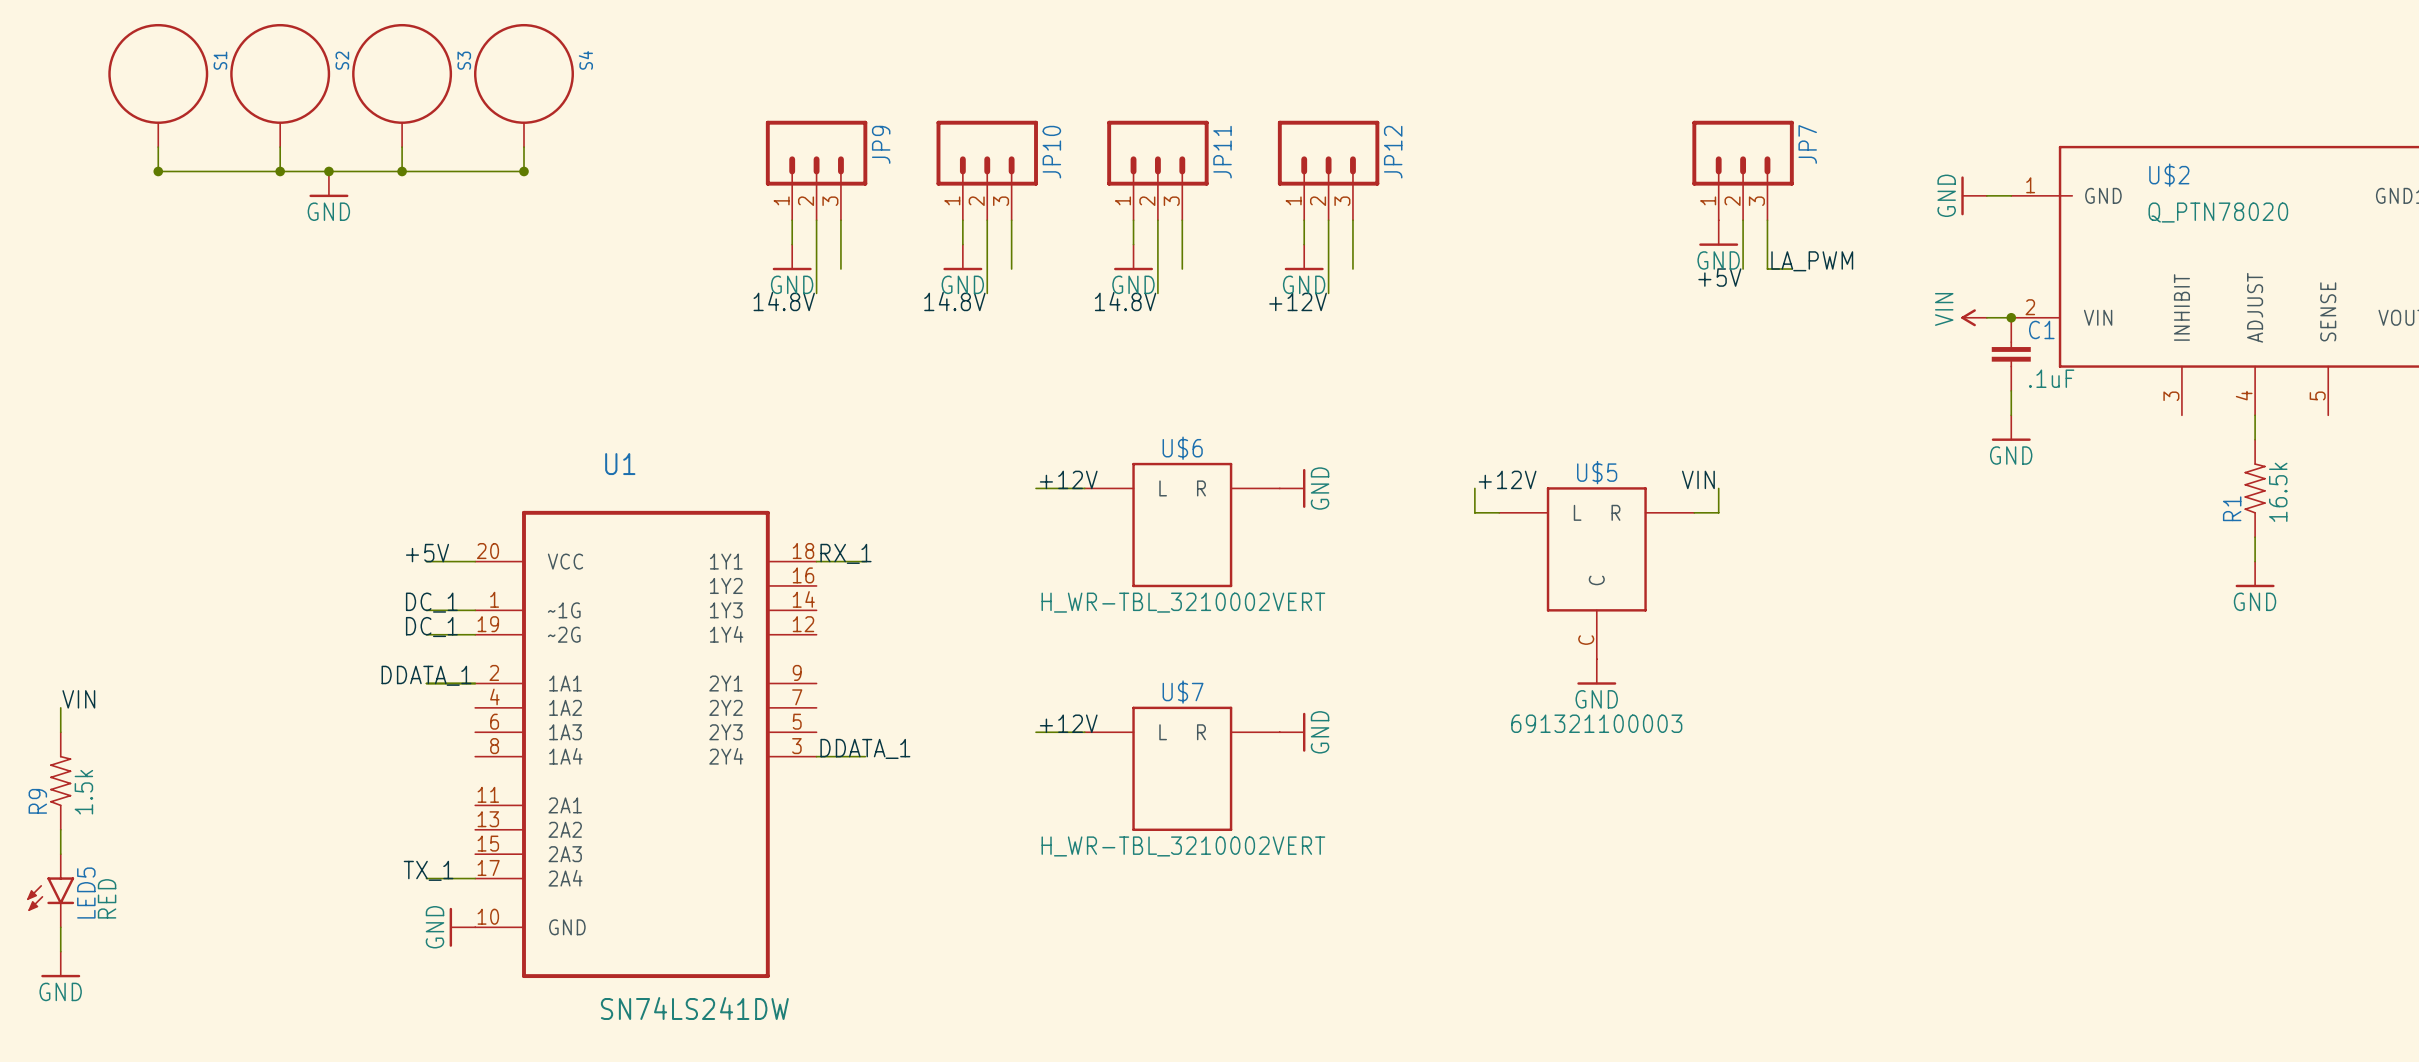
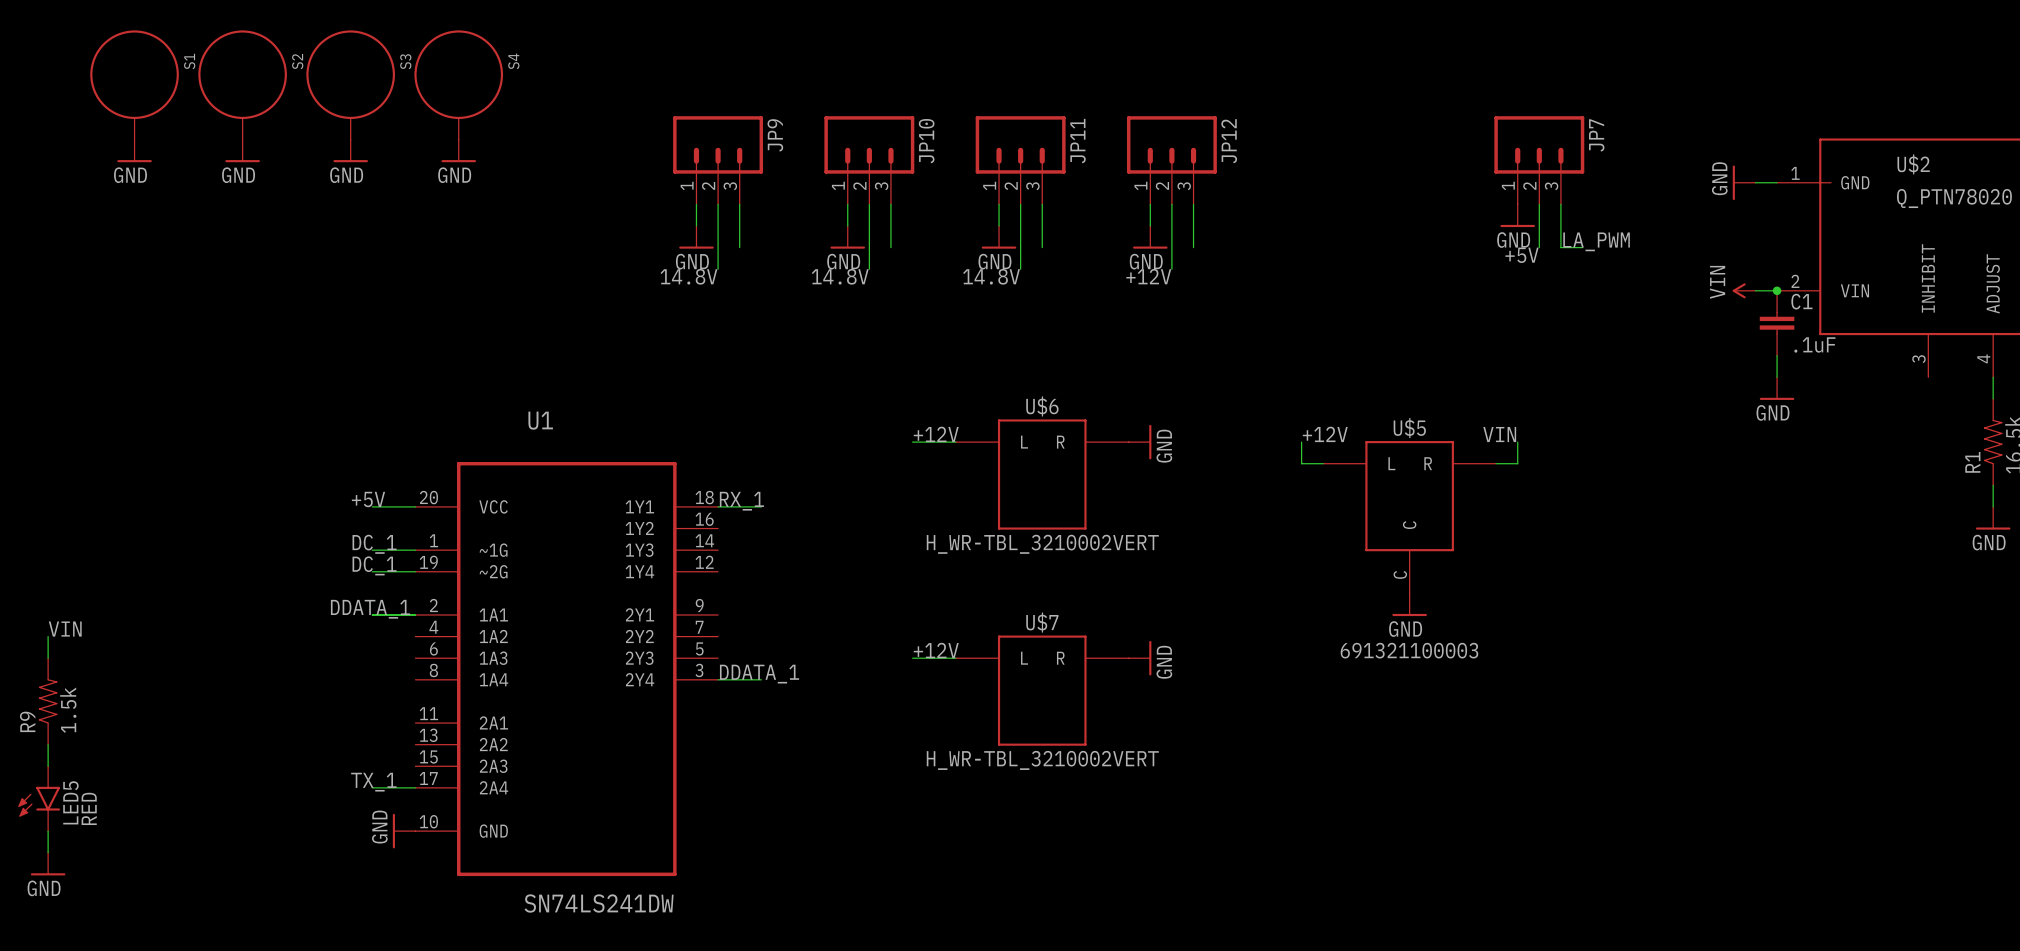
wire: (158, 147) (158, 171) (523, 171) (523, 147) -> none
power symbol: none -> GND (134, 150)
power symbol: none -> GND (242, 150)
power symbol: none -> GND (350, 150)
power symbol: none -> GND (458, 150)
junction: (158, 171) -> none
junction: (280, 171) -> none
junction: (328, 171) -> none
junction: (402, 171) -> none
junction: (523, 171) -> none
power symbol: GND (328, 184) -> none

